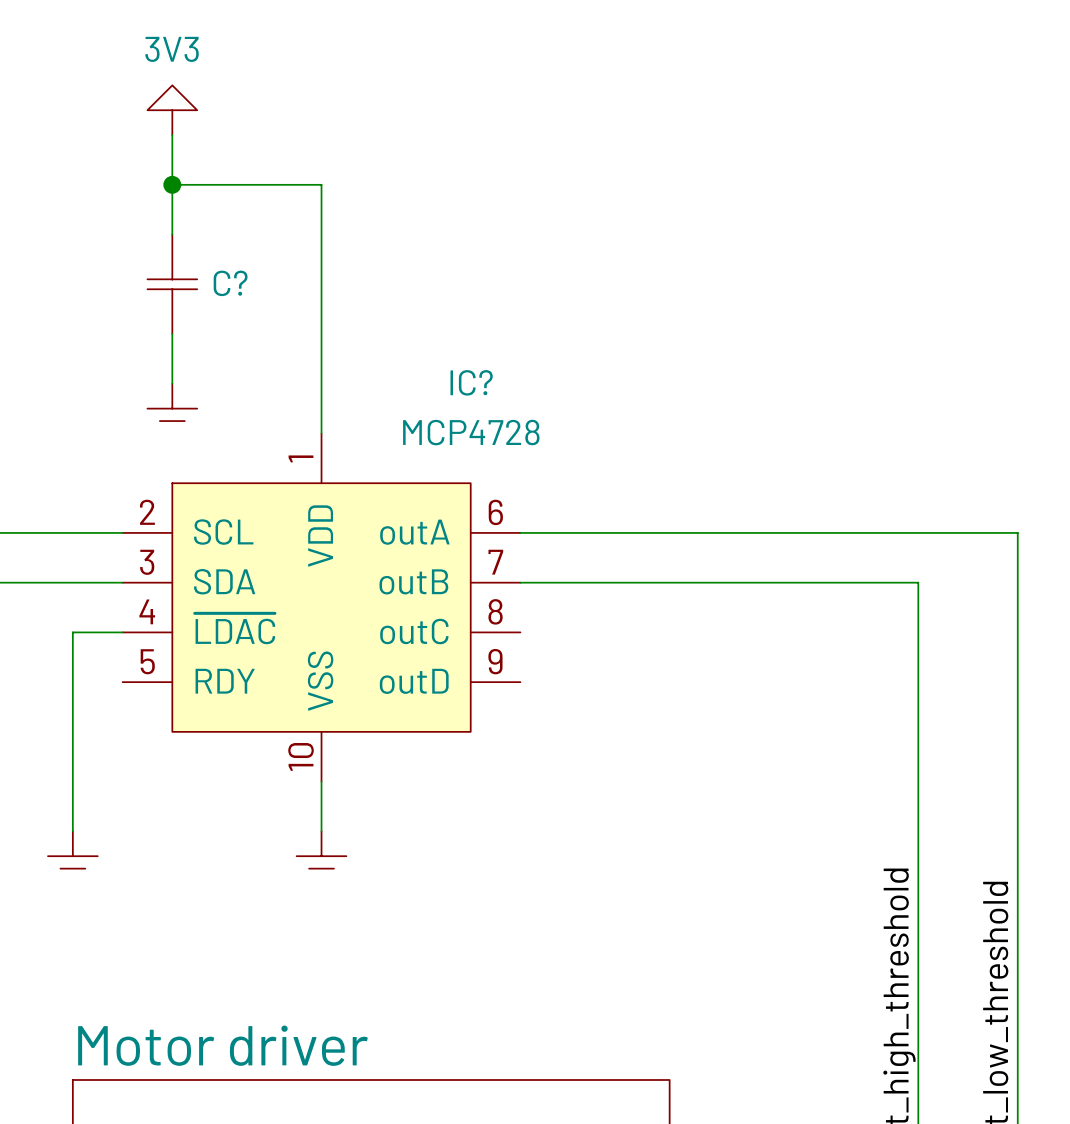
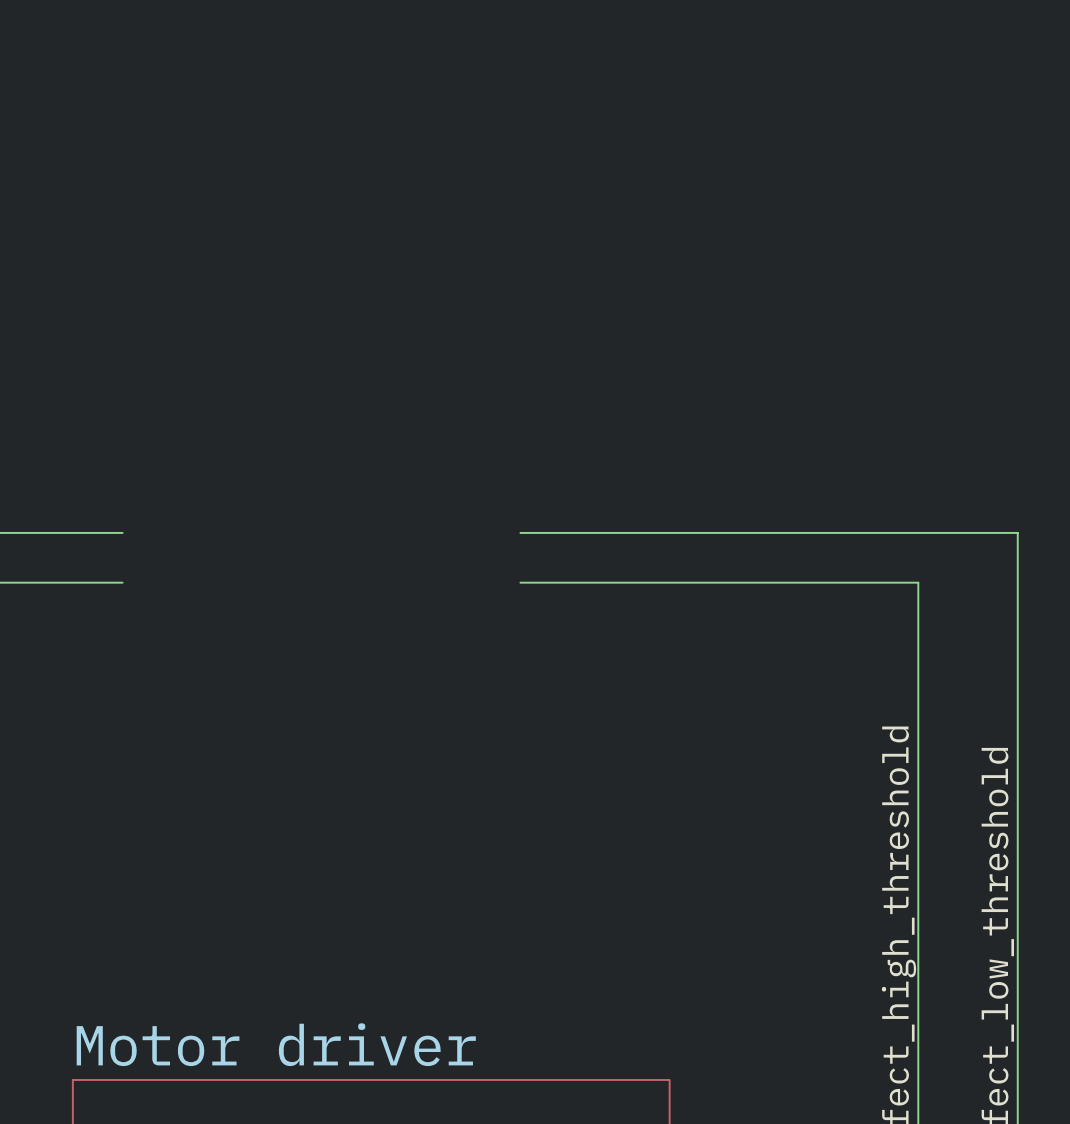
power symbol: 3V3 (172, 110) -> none
wire: (172, 135) (172, 234) -> none
wire: (172, 184) (321, 184) (321, 433) -> none
junction: (172, 184) -> none
C?: (172, 284) -> none
wire: (172, 334) (172, 383) -> none
power symbol: (172, 408) -> none
IC?: MCP4728 (321, 607) -> none
wire: (122, 632) (72, 632) (72, 831) -> none
wire: (321, 781) (321, 831) -> none
power symbol: (72, 856) -> none
power symbol: (321, 856) -> none

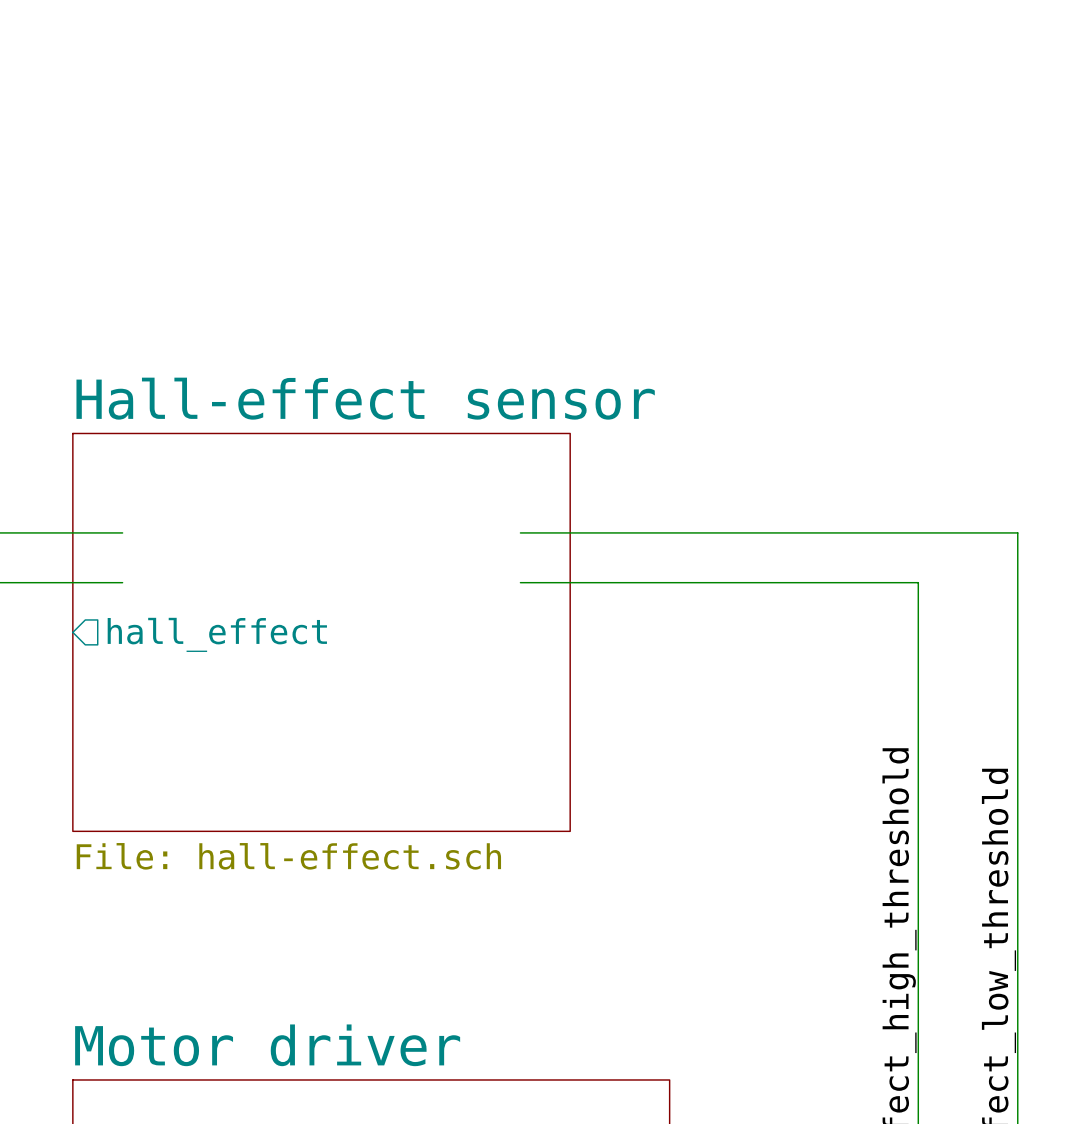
sheet Hall-effect sensor: none -> File: hall-effect.sch (321, 632)
sheet pin: none -> hall_effect (217, 634)

